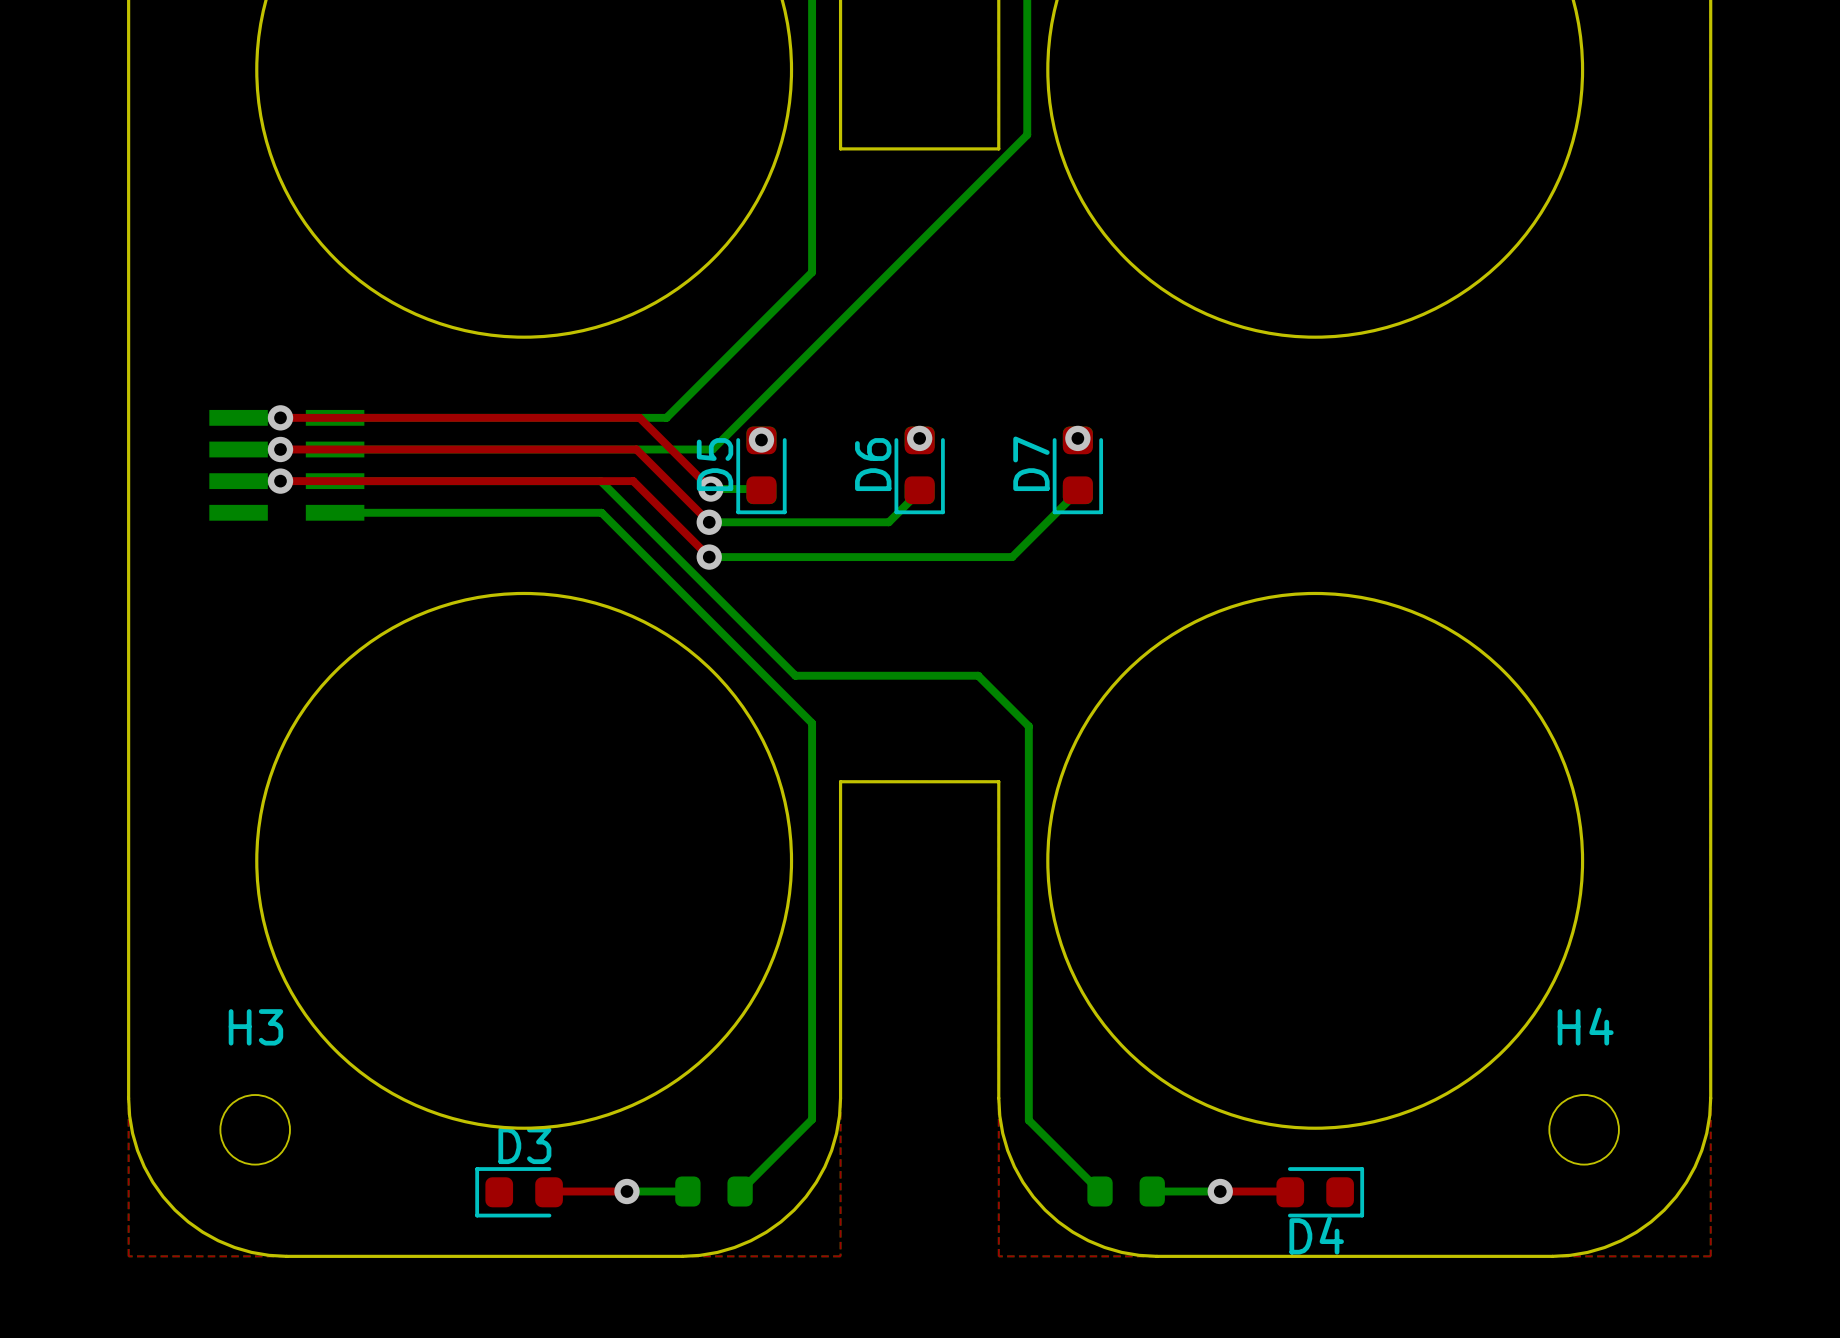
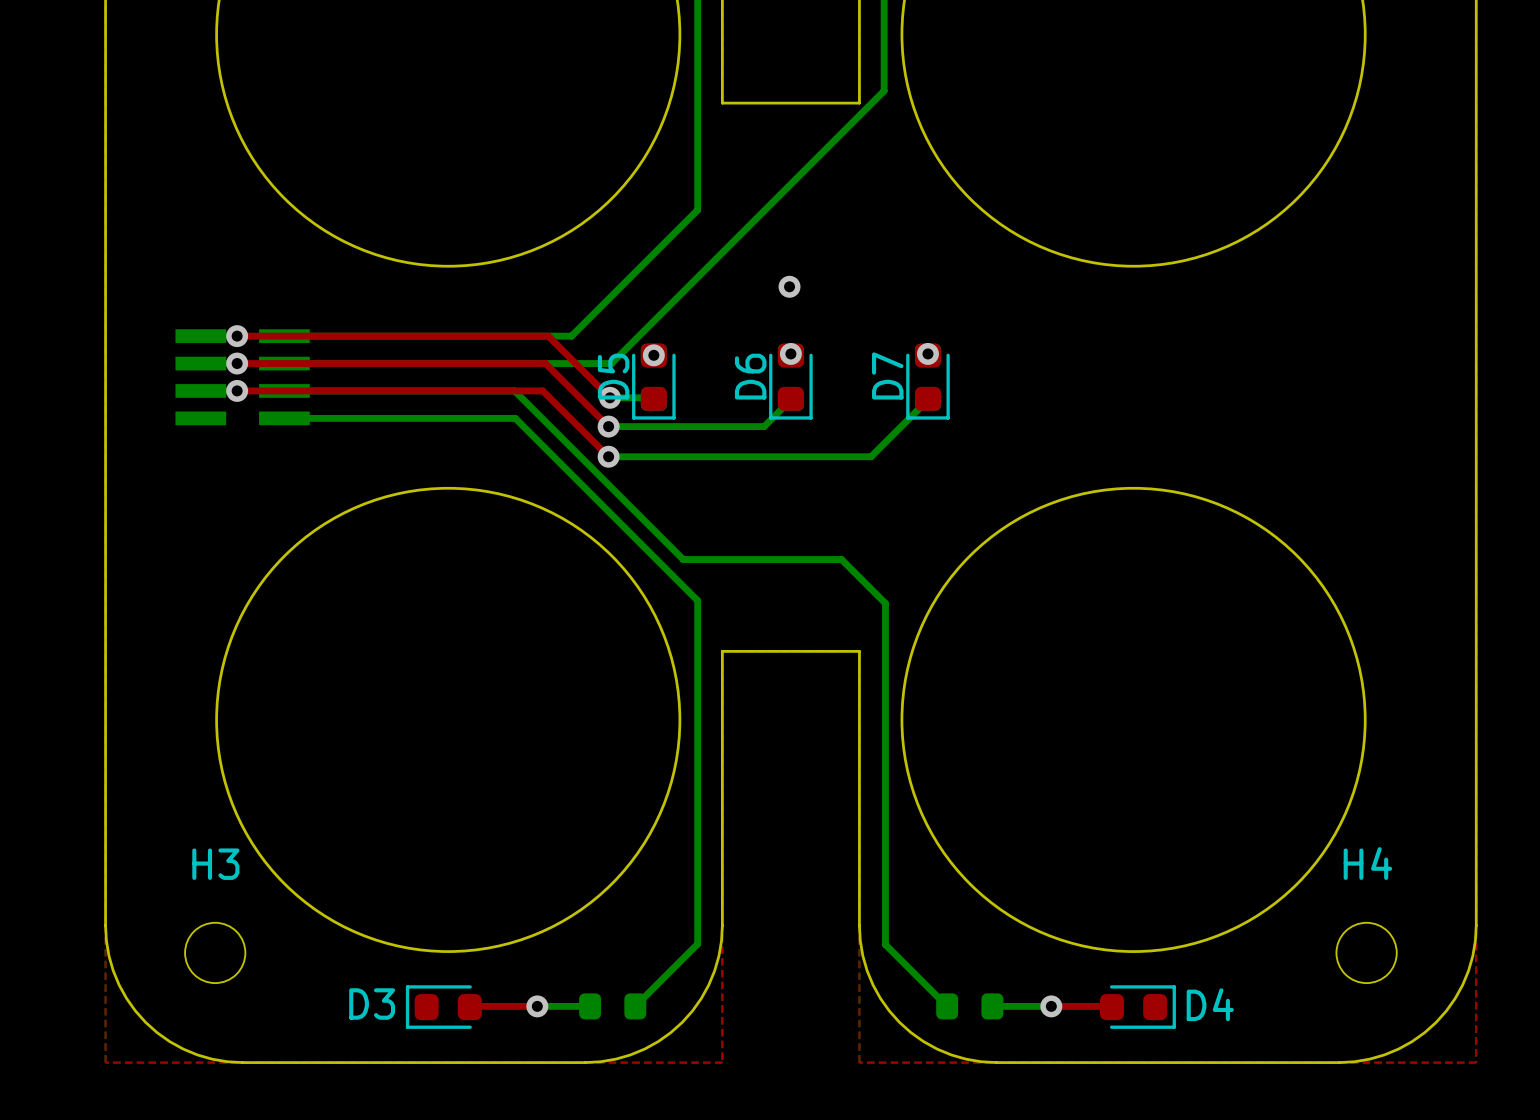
via: none -> (789, 286)
D3 name position: D3 (524, 1145) -> D3 (372, 1004)
D4 name position: D4 (1316, 1235) -> D4 (1210, 1004)

